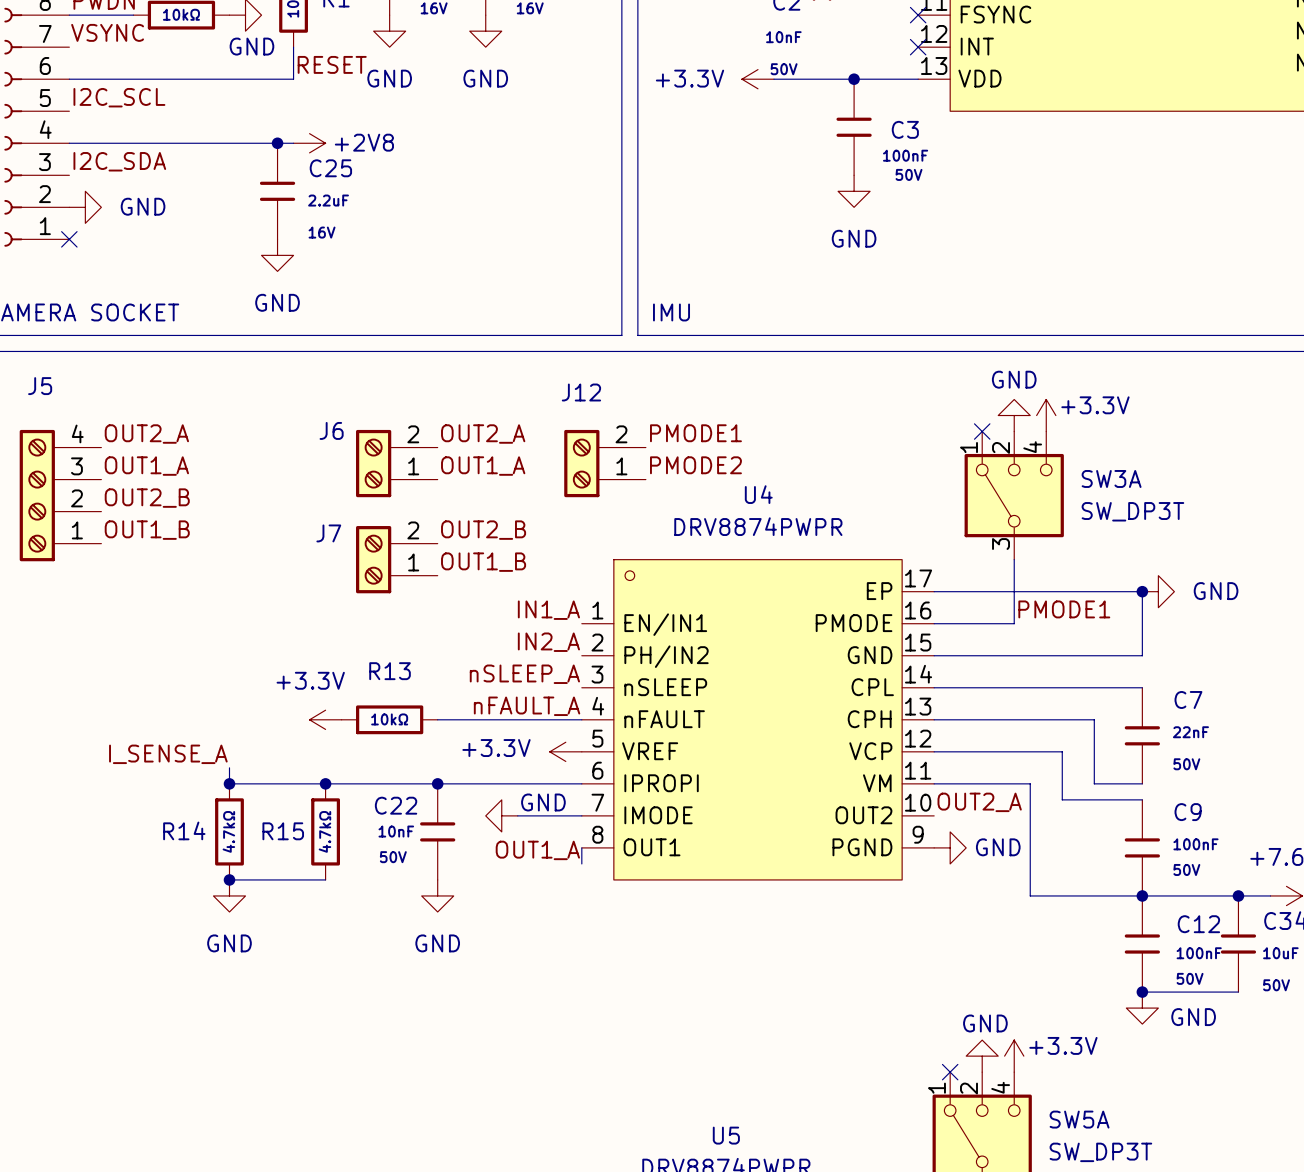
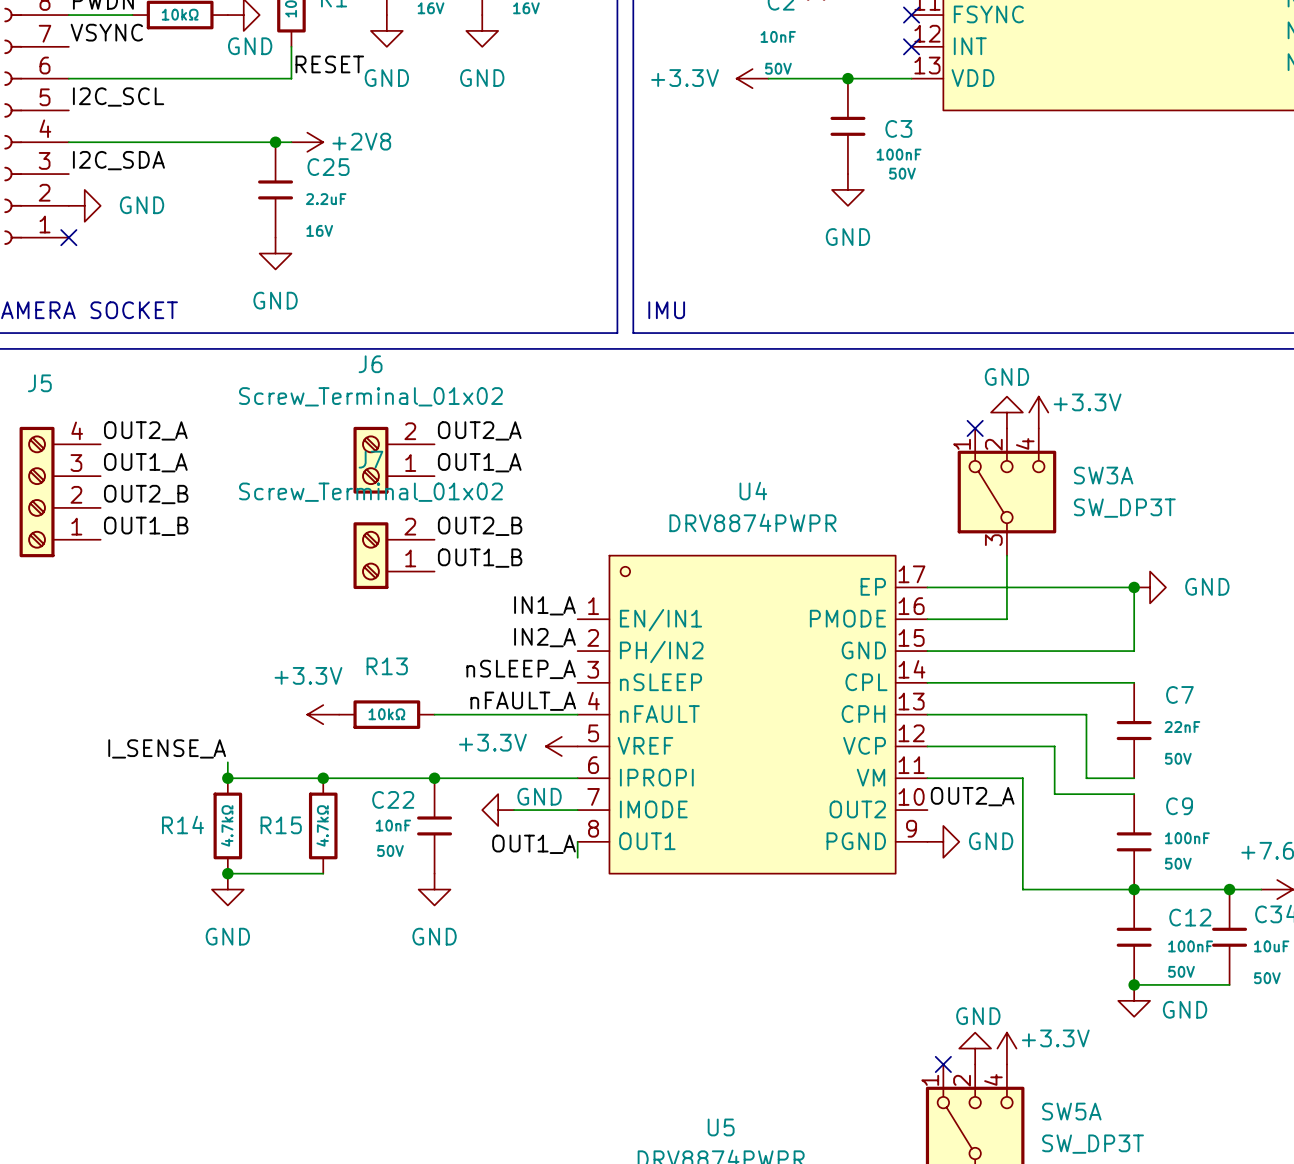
J6 value: none -> Screw_Terminal_01x02 (370, 396)
J6 name position: J6 (331, 430) -> J6 (370, 364)
label: PMODE1 (695, 433) -> none
J12: (605, 463) -> none
label: PMODE2 (695, 465) -> none
J7 value: none -> Screw_Terminal_01x02 (370, 492)
J7 name position: J7 (328, 533) -> J7 (370, 459)
label: PMODE1 (1064, 609) -> none

